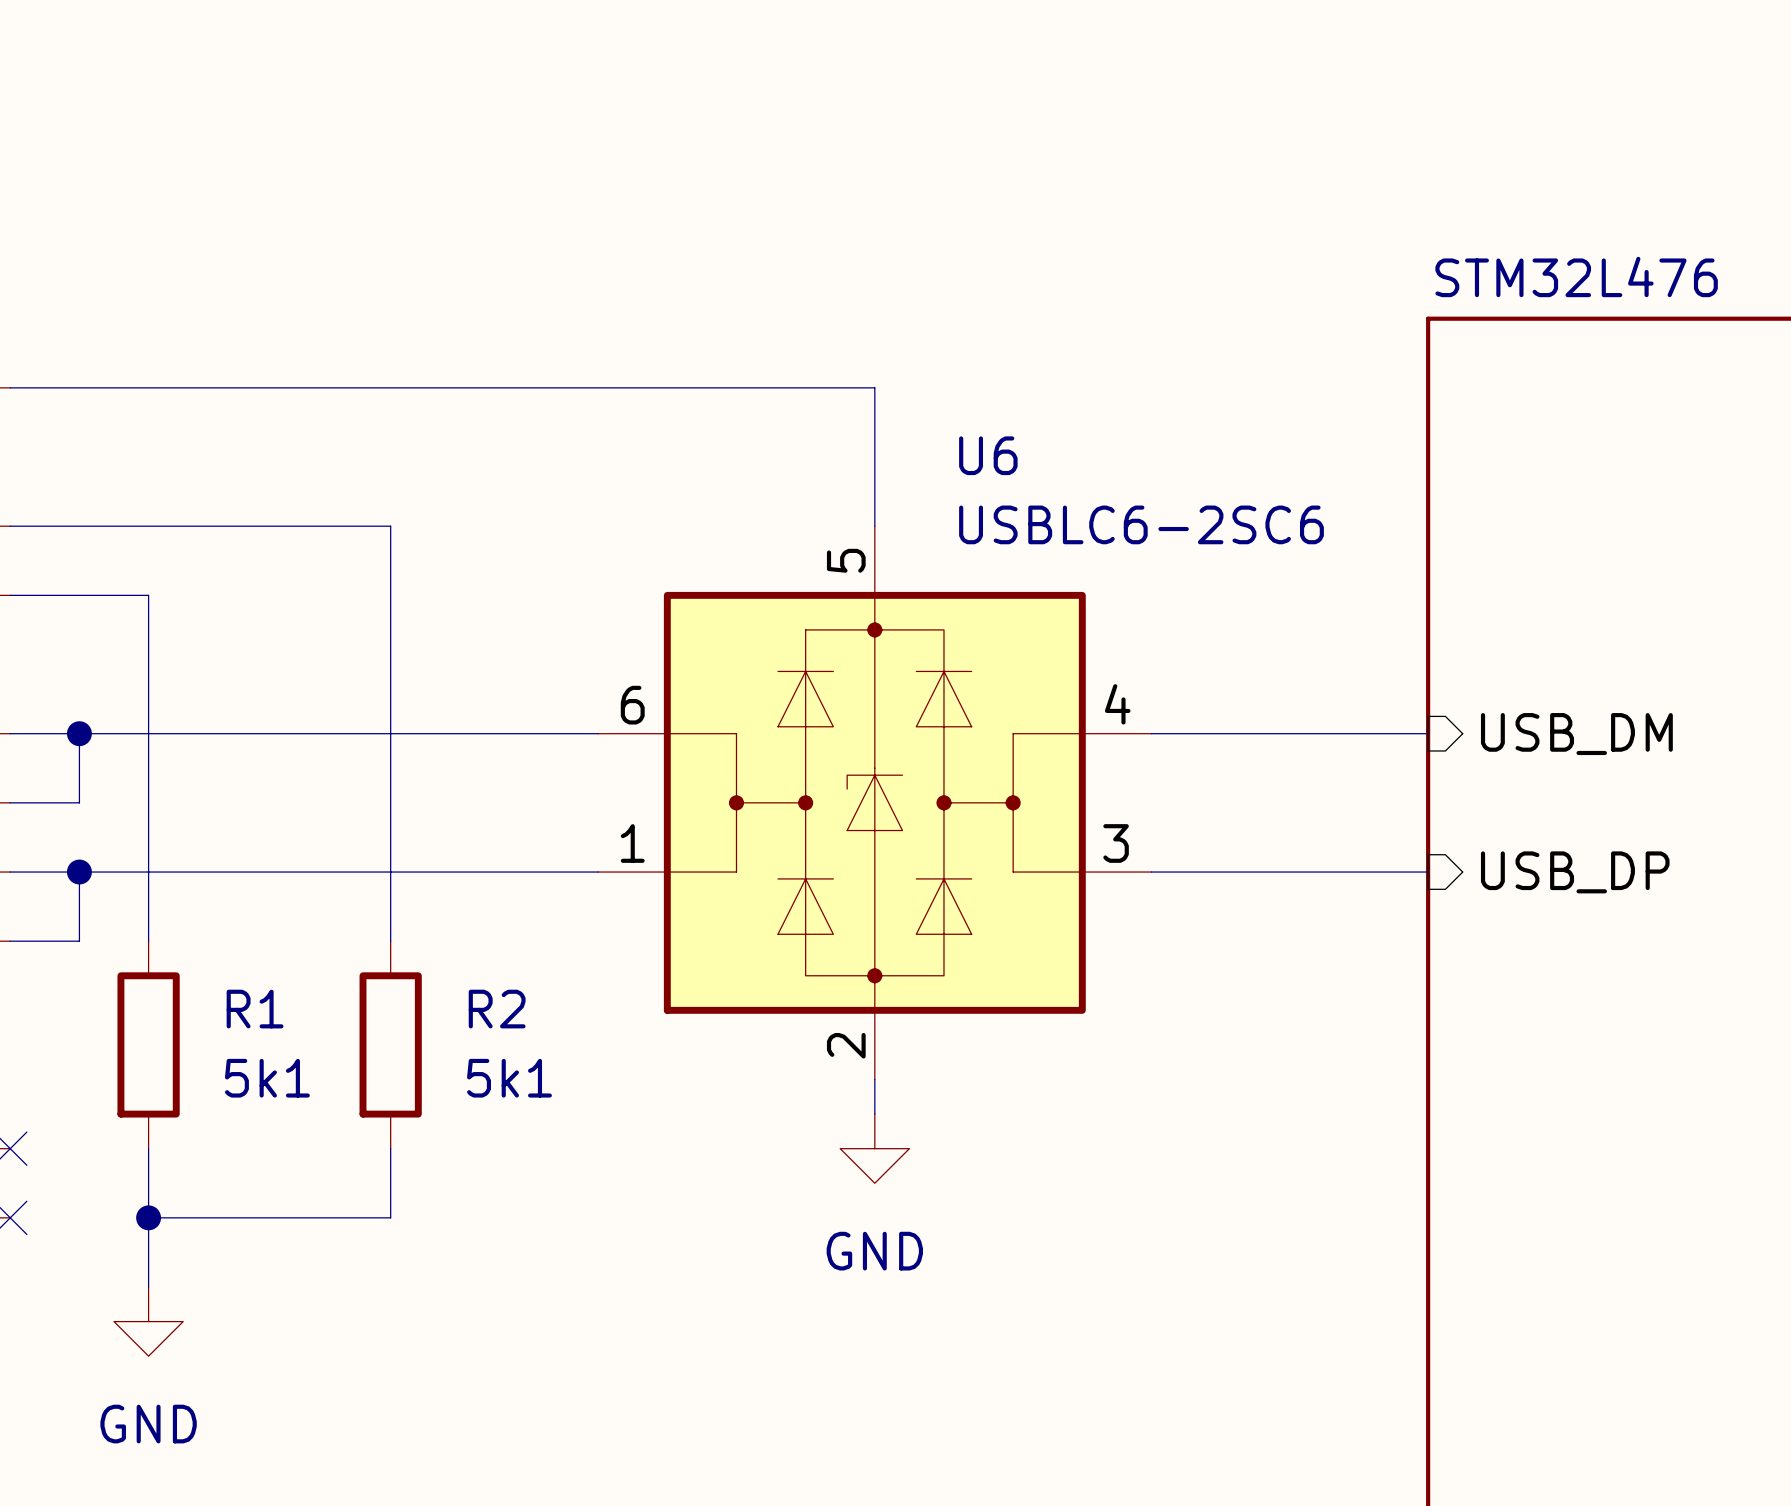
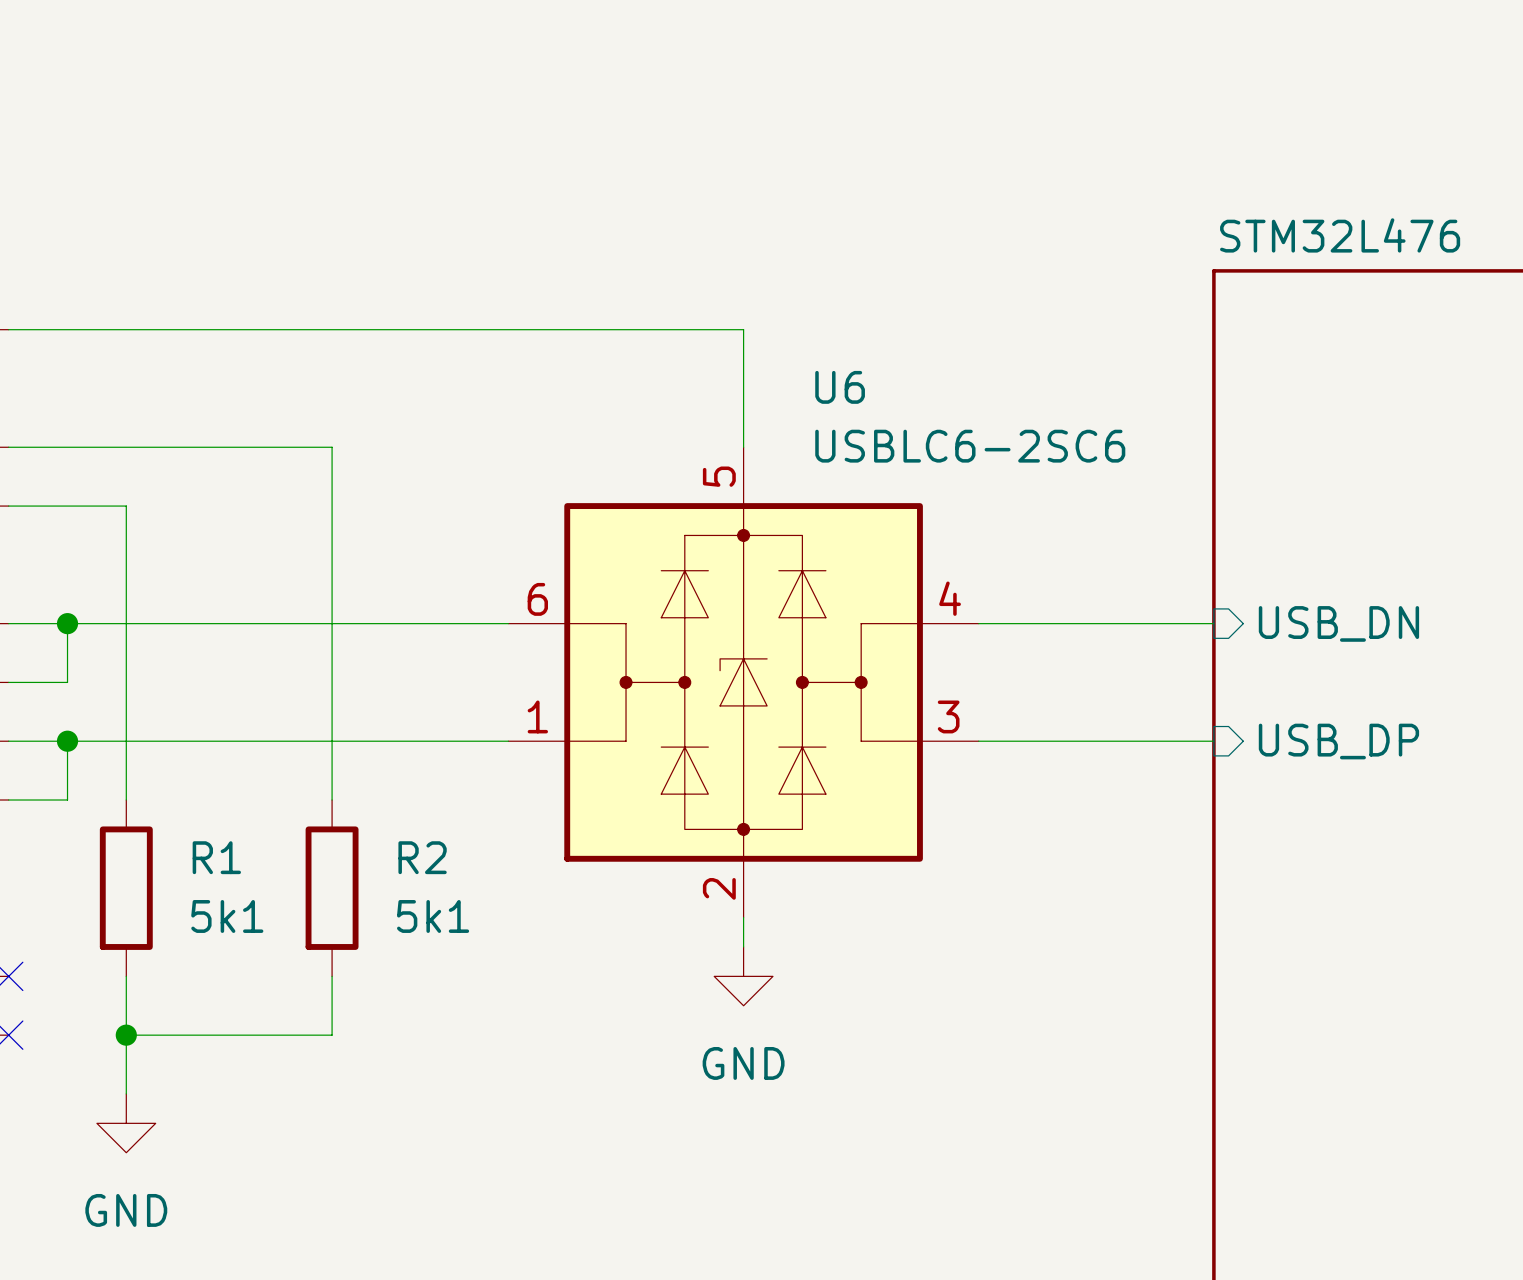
sheet pin: USB_DM (1576, 734) -> USB_DN (1338, 623)

